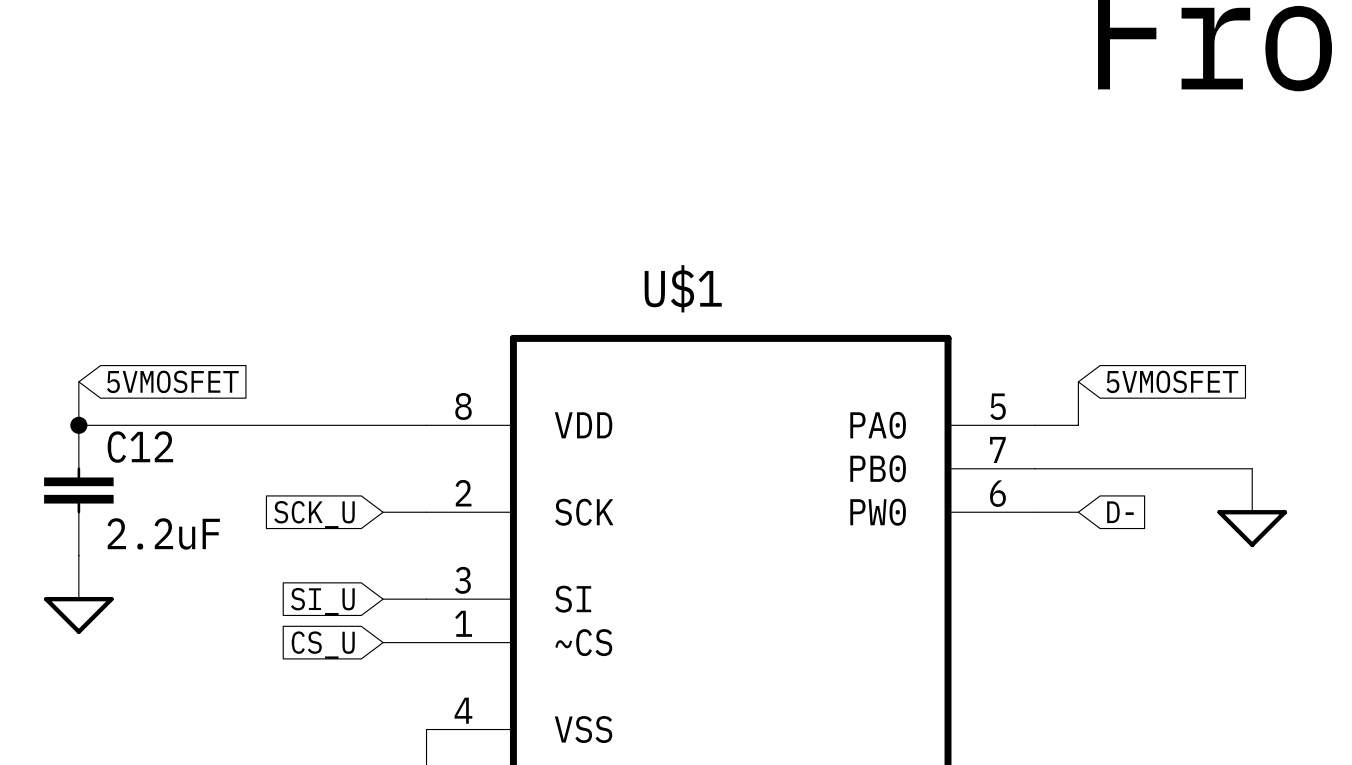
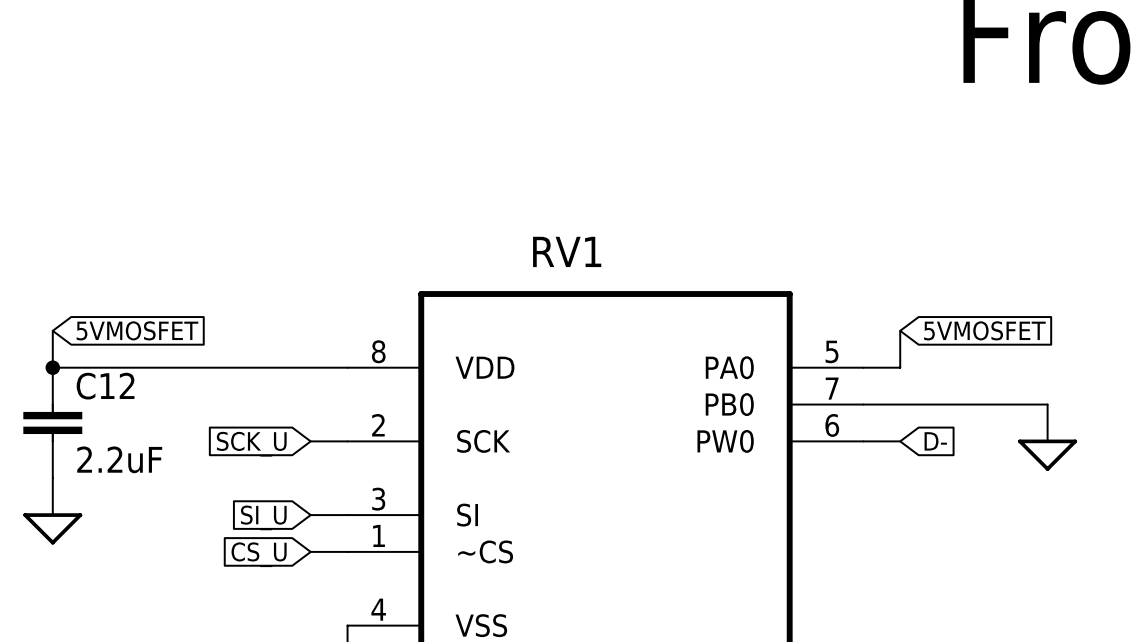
U$1 name: U$1 (683, 288) -> RV1 (567, 251)

